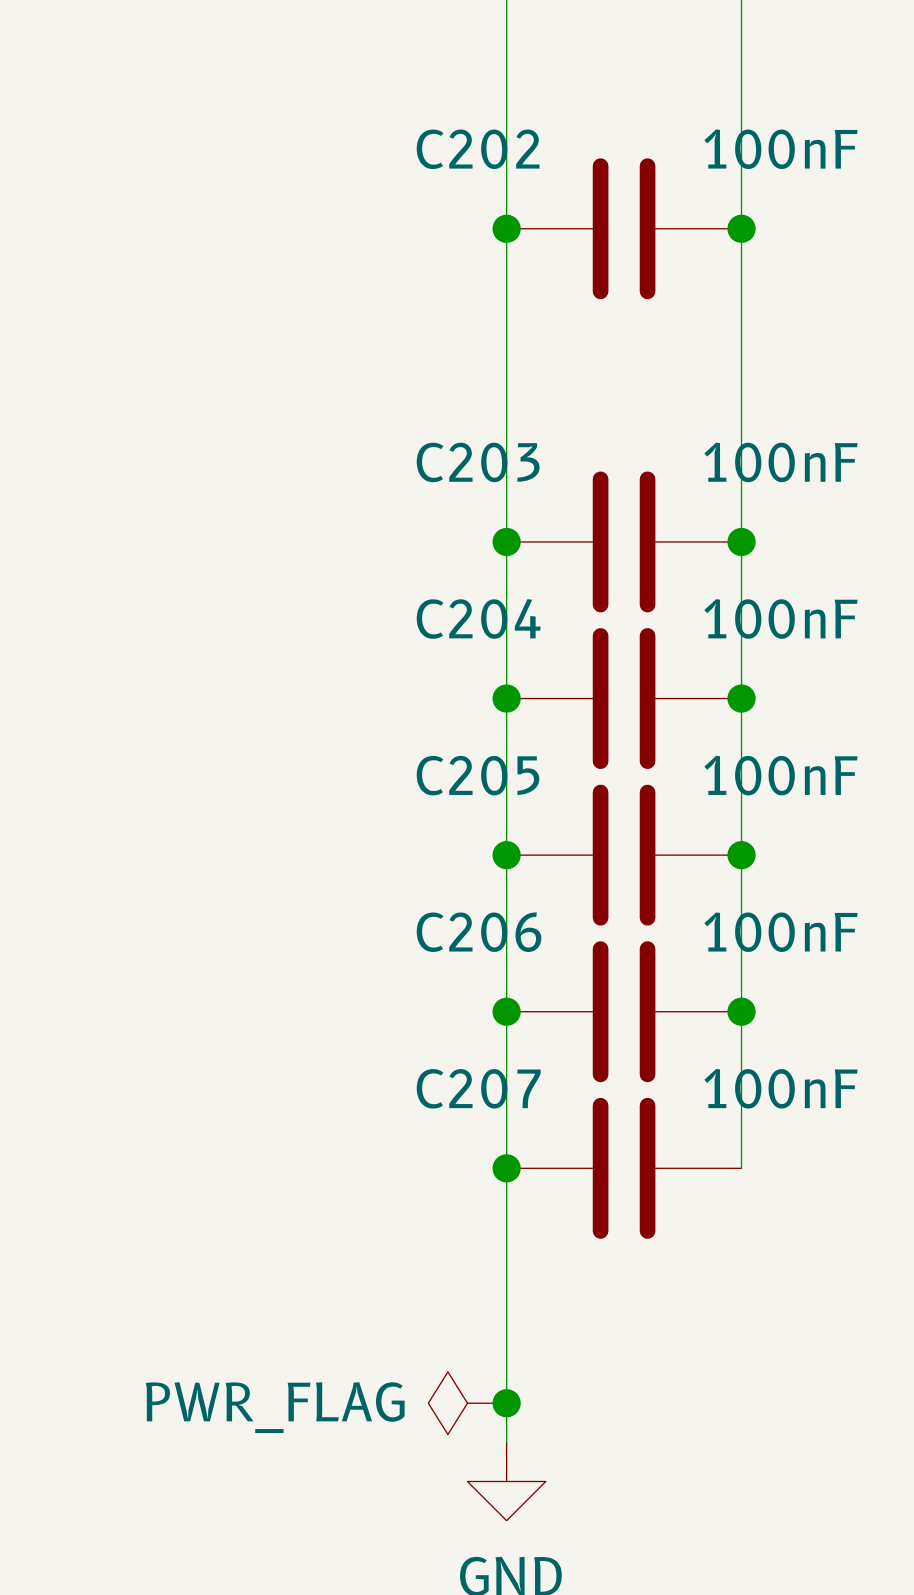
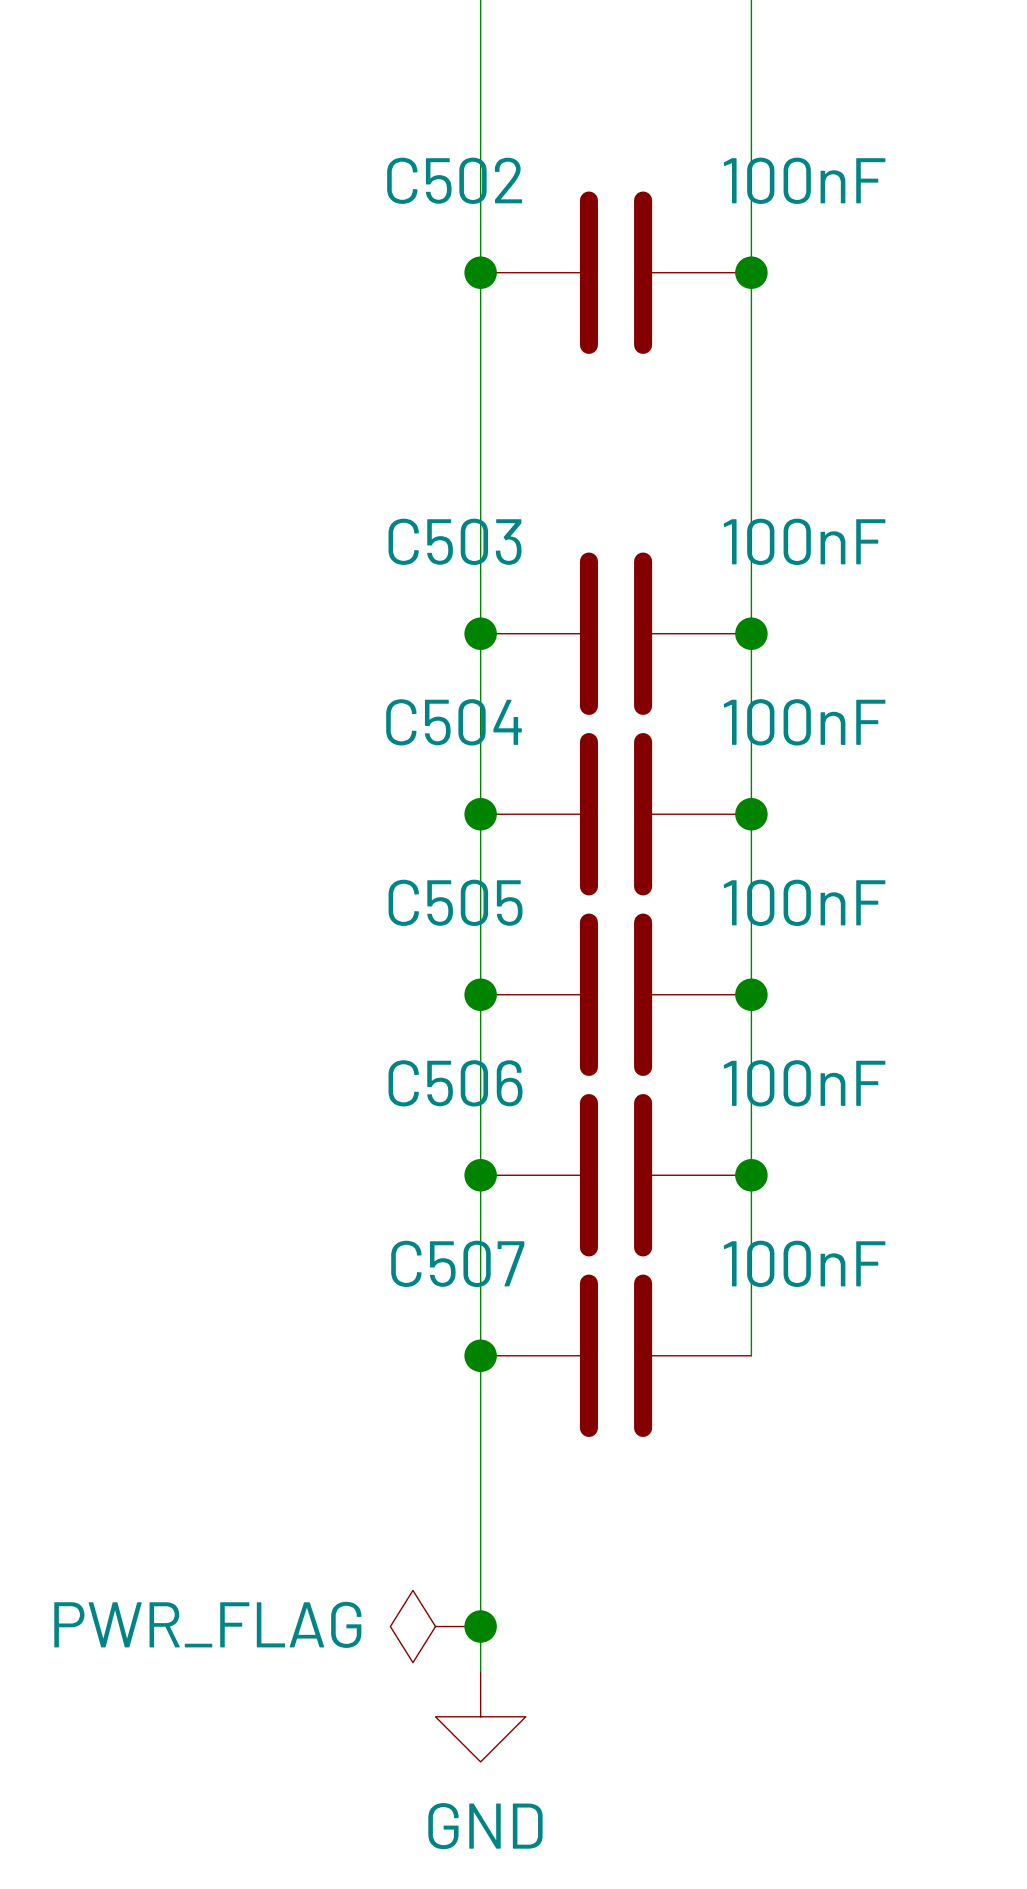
C202 name: C202 (478, 149) -> C502 (454, 180)
C203 name: C203 (478, 462) -> C503 (455, 541)
C204 name: C204 (478, 619) -> C504 (454, 722)
C205 name: C205 (478, 775) -> C505 (455, 902)
C206 name: C206 (479, 932) -> C506 (455, 1083)
C207 name: C207 (478, 1088) -> C507 (457, 1263)

